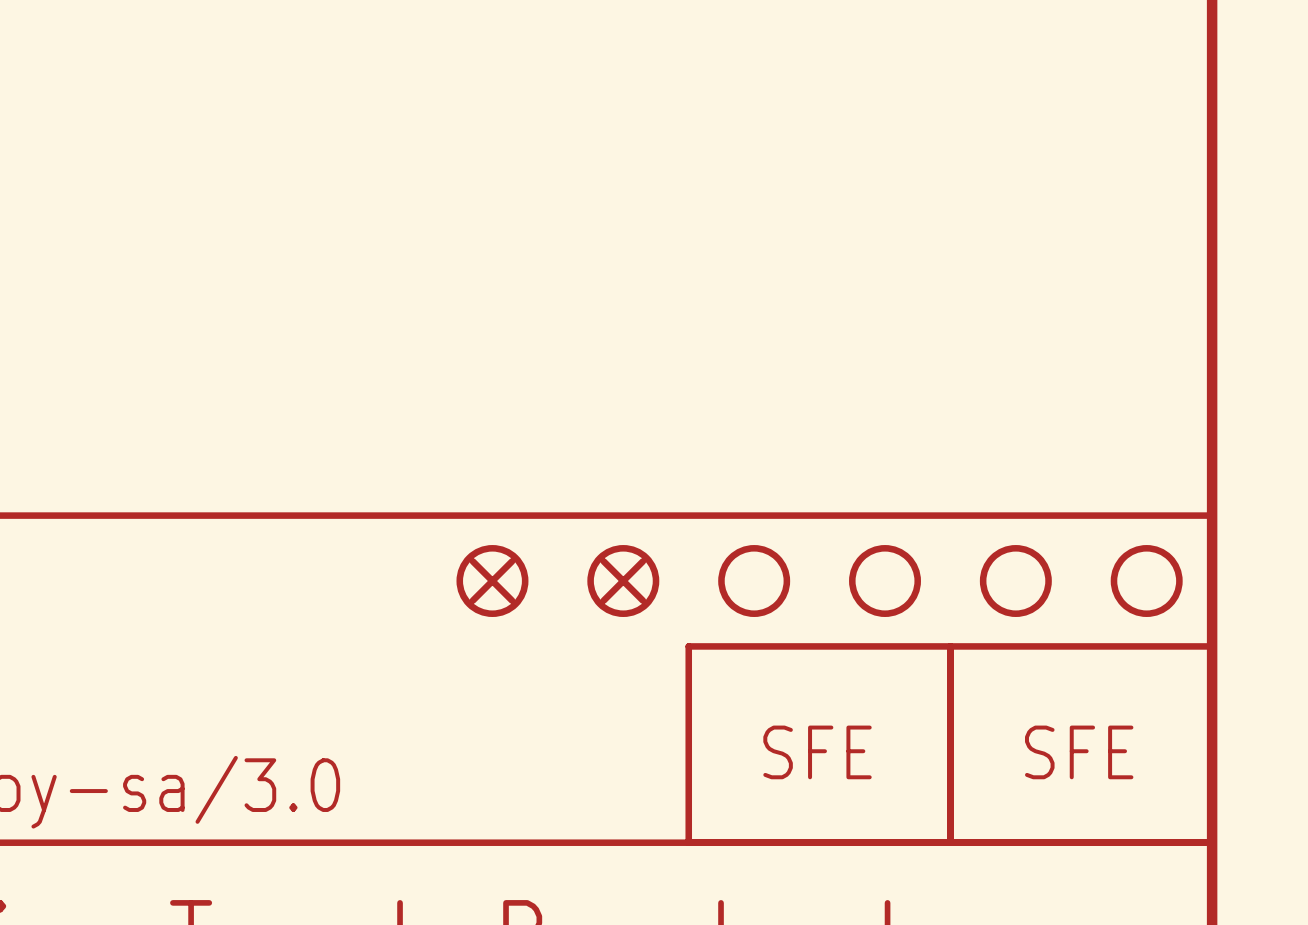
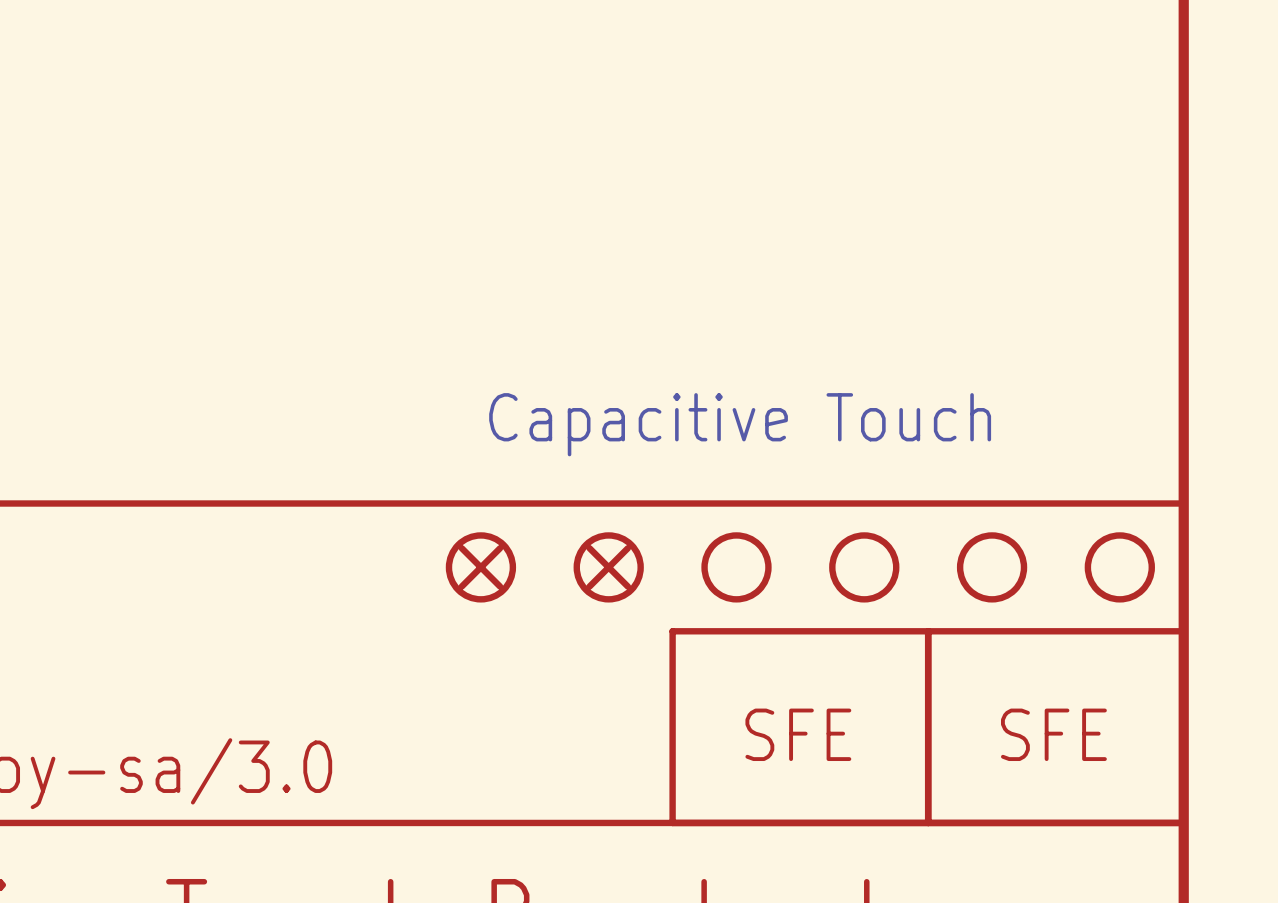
text: none -> Capacitive Touch (740, 424)

